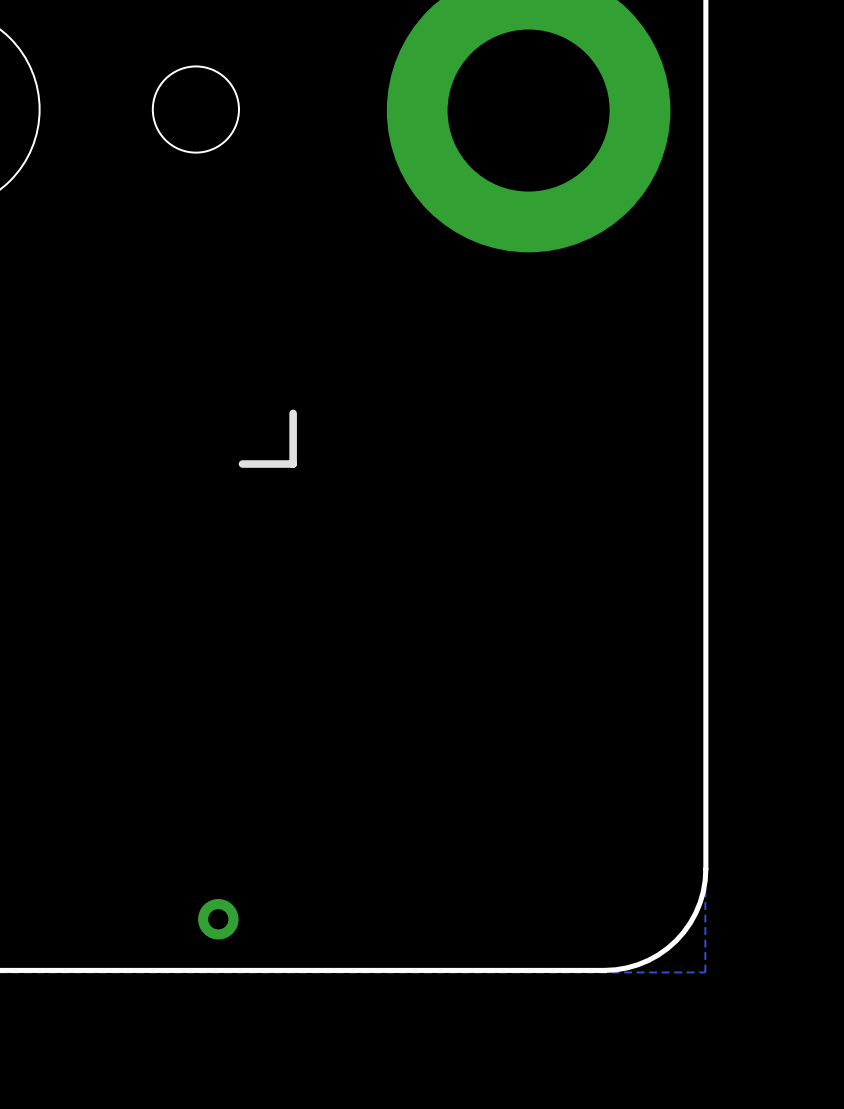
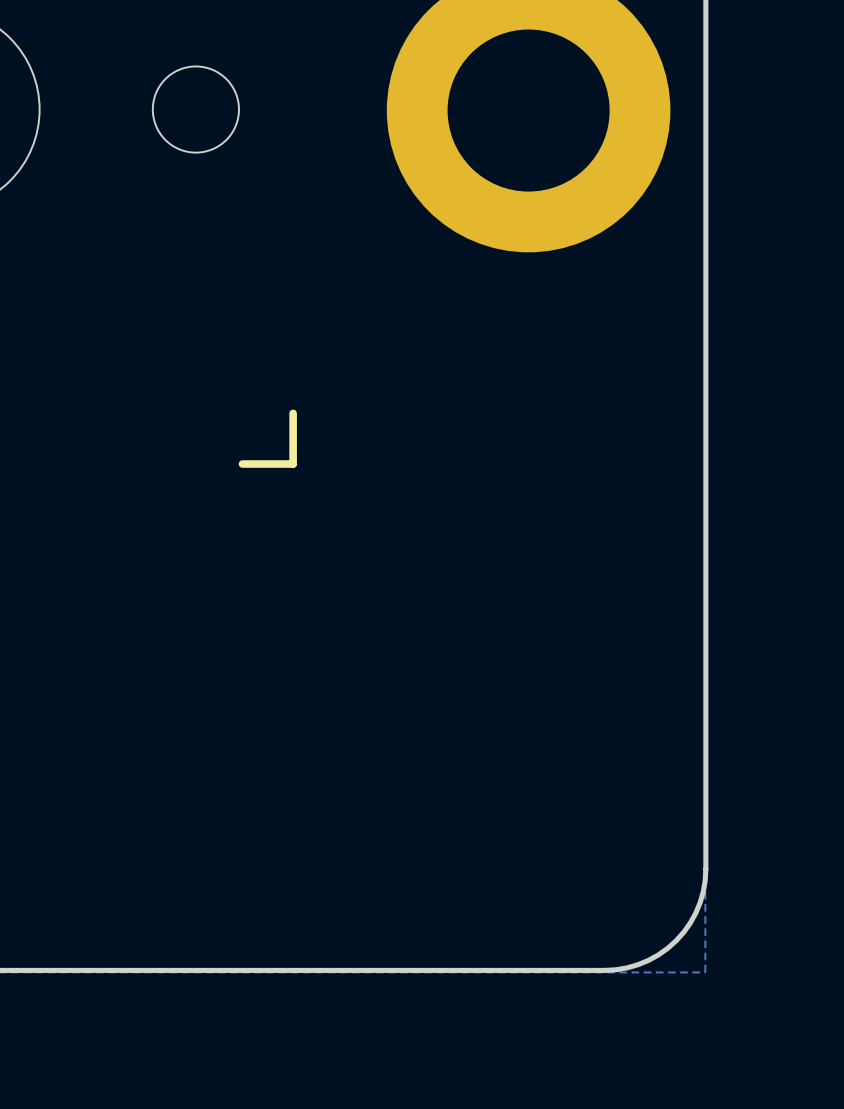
via: (218, 919) -> none

